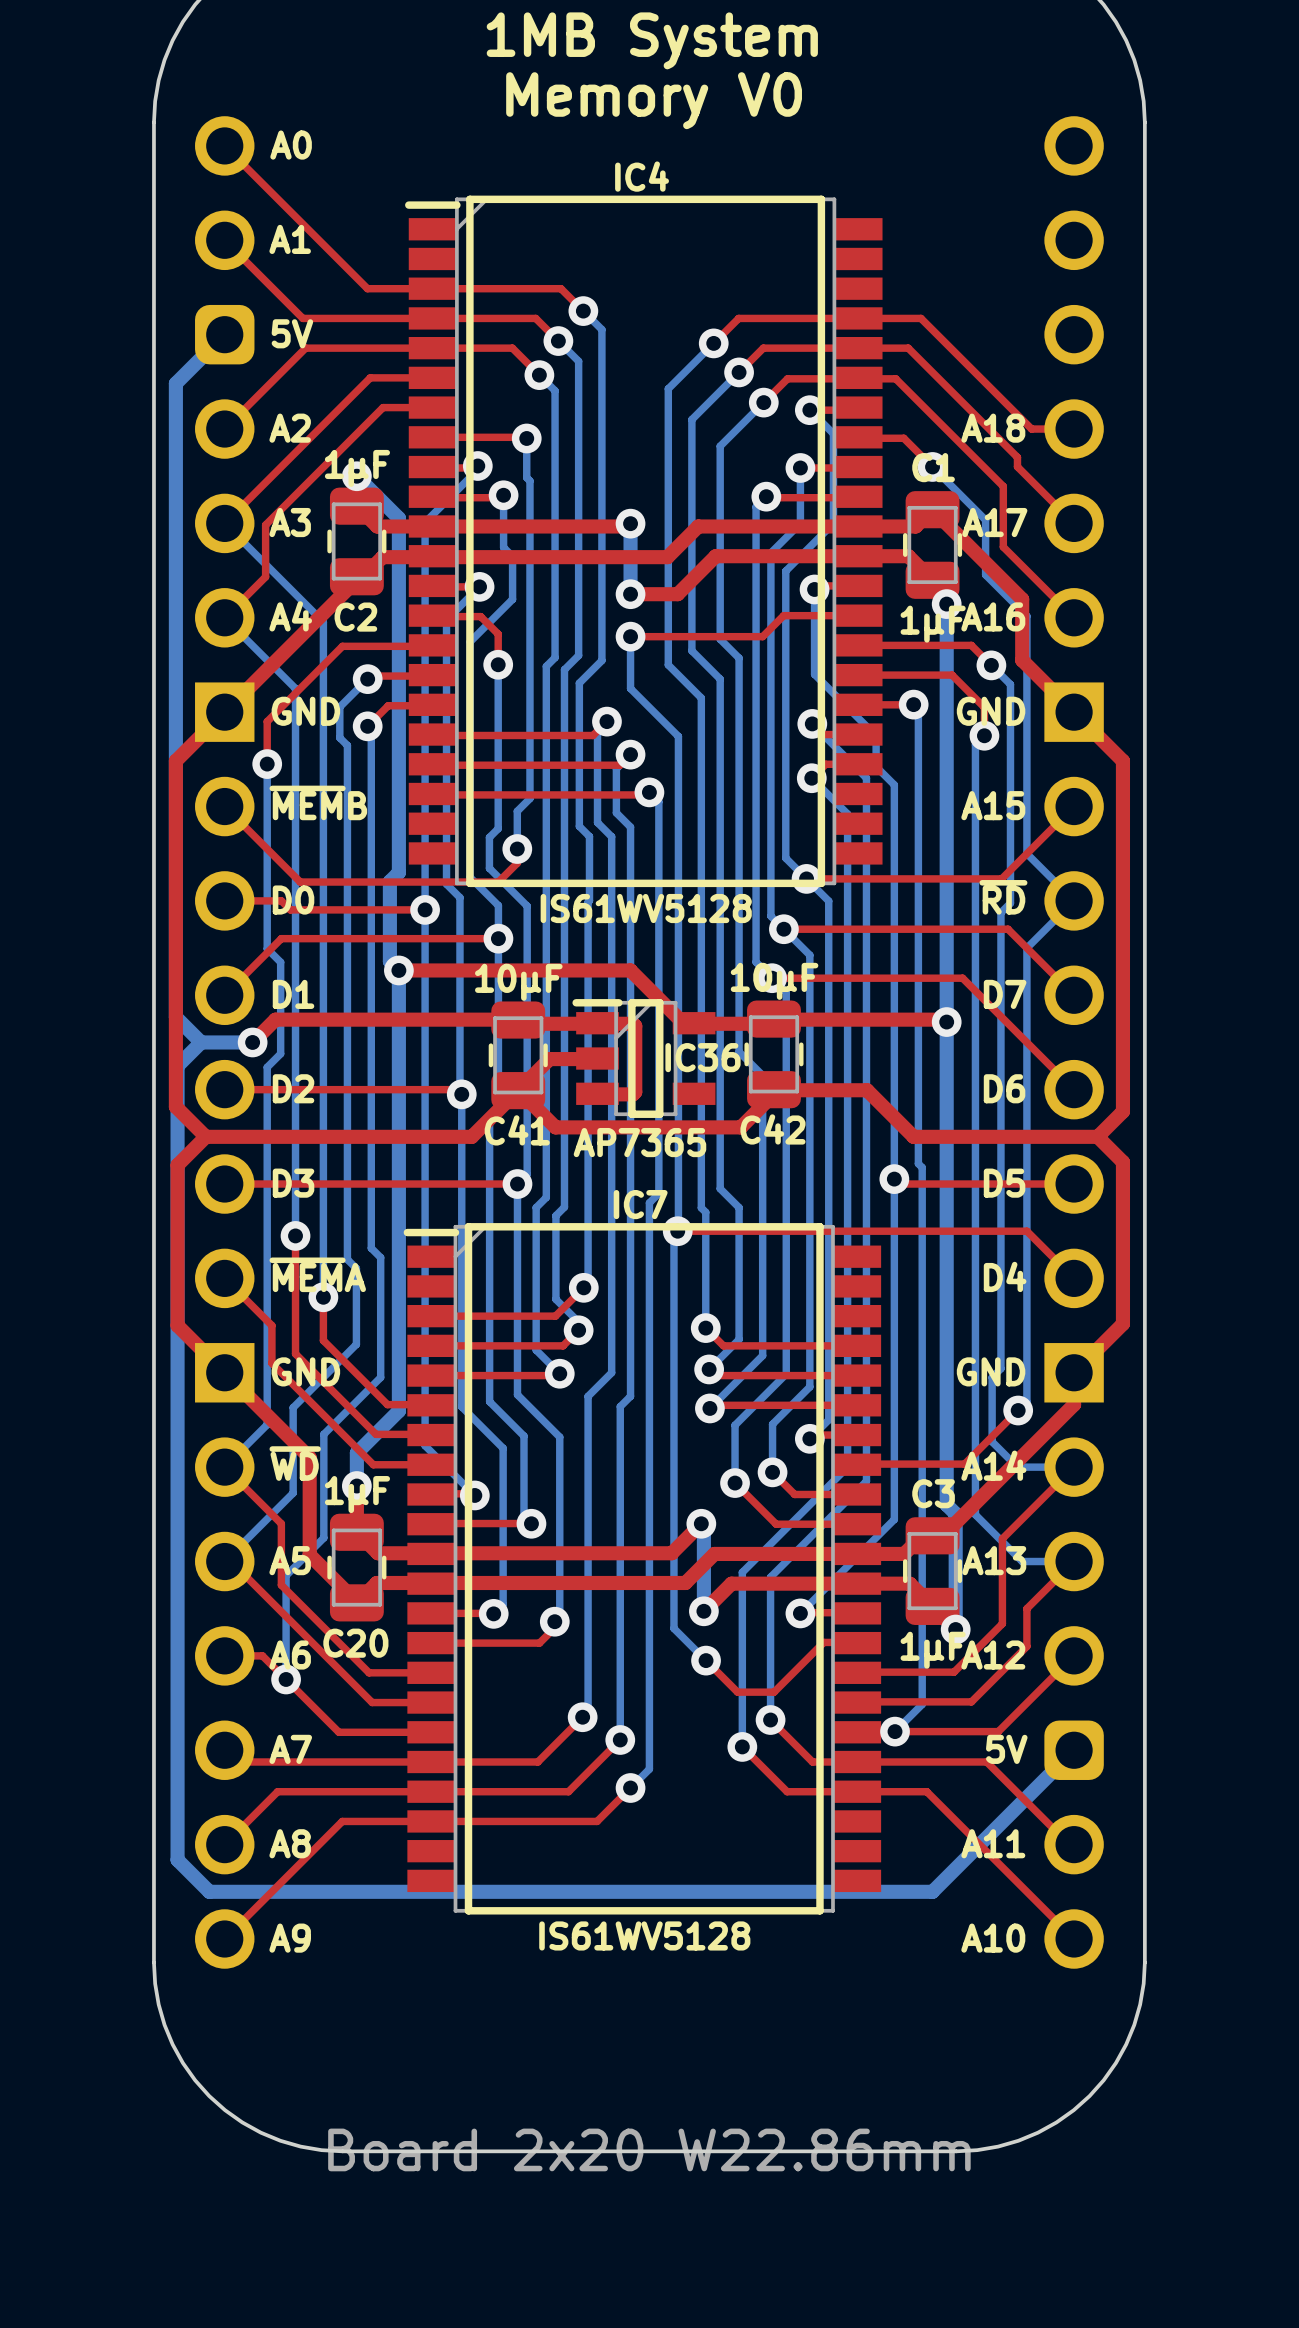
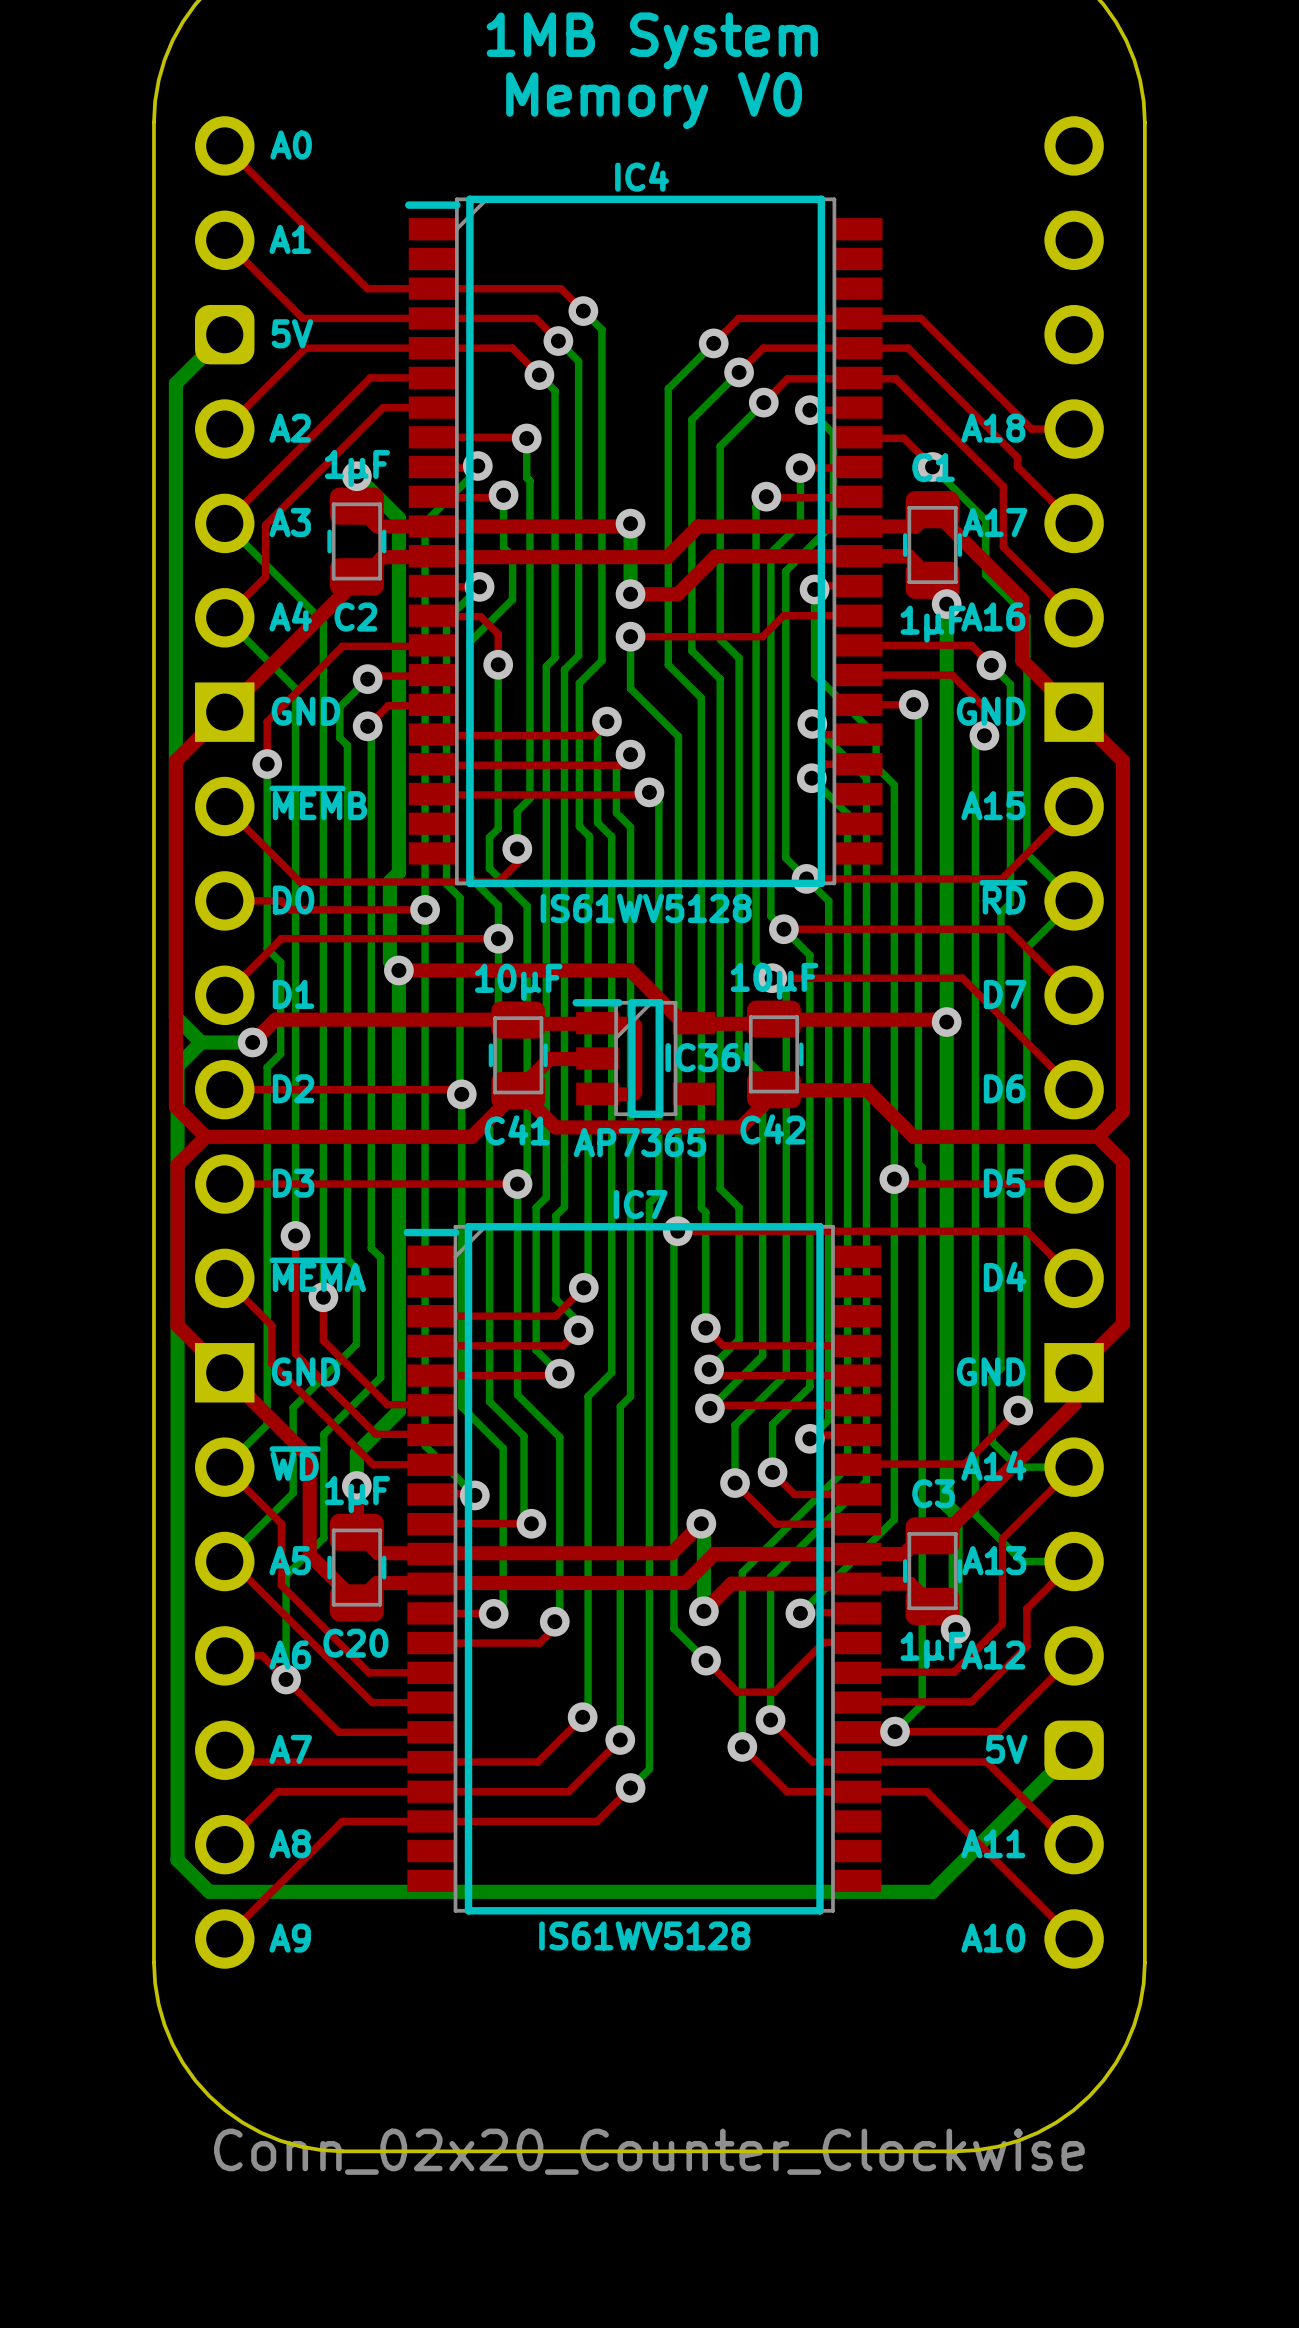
part value: Board 2x20 W22.86mm (649, 2149) -> Conn_02x20_Counter_Clockwise (649, 2151)

